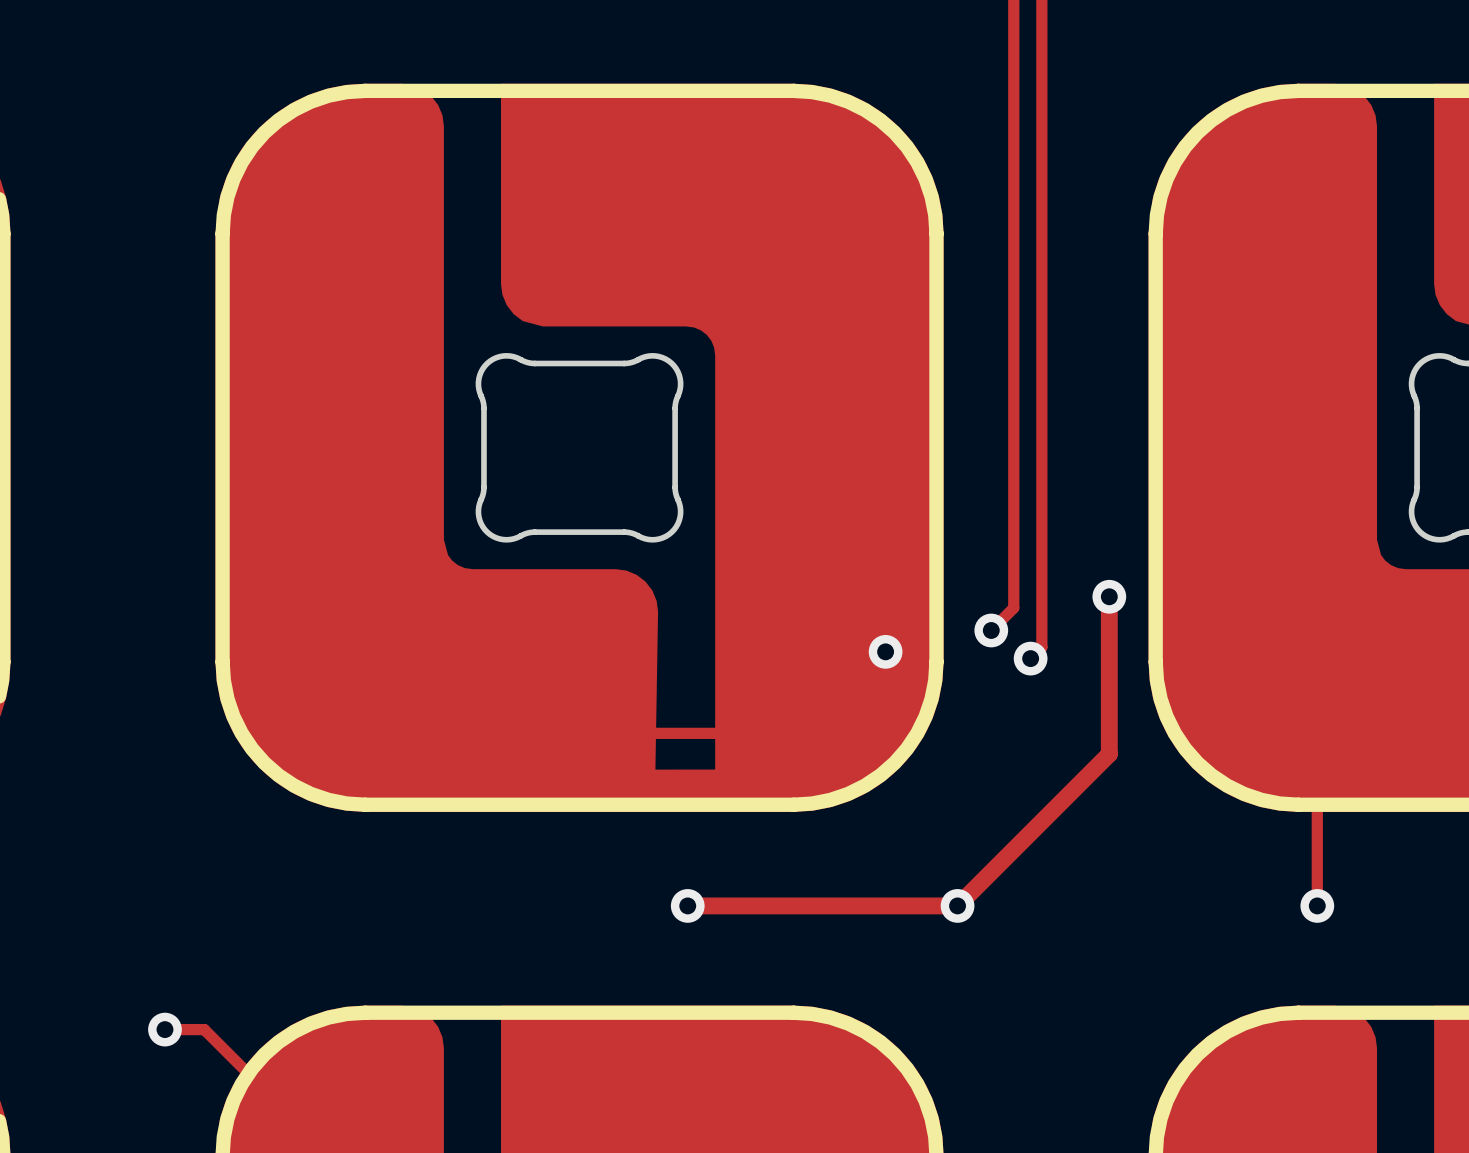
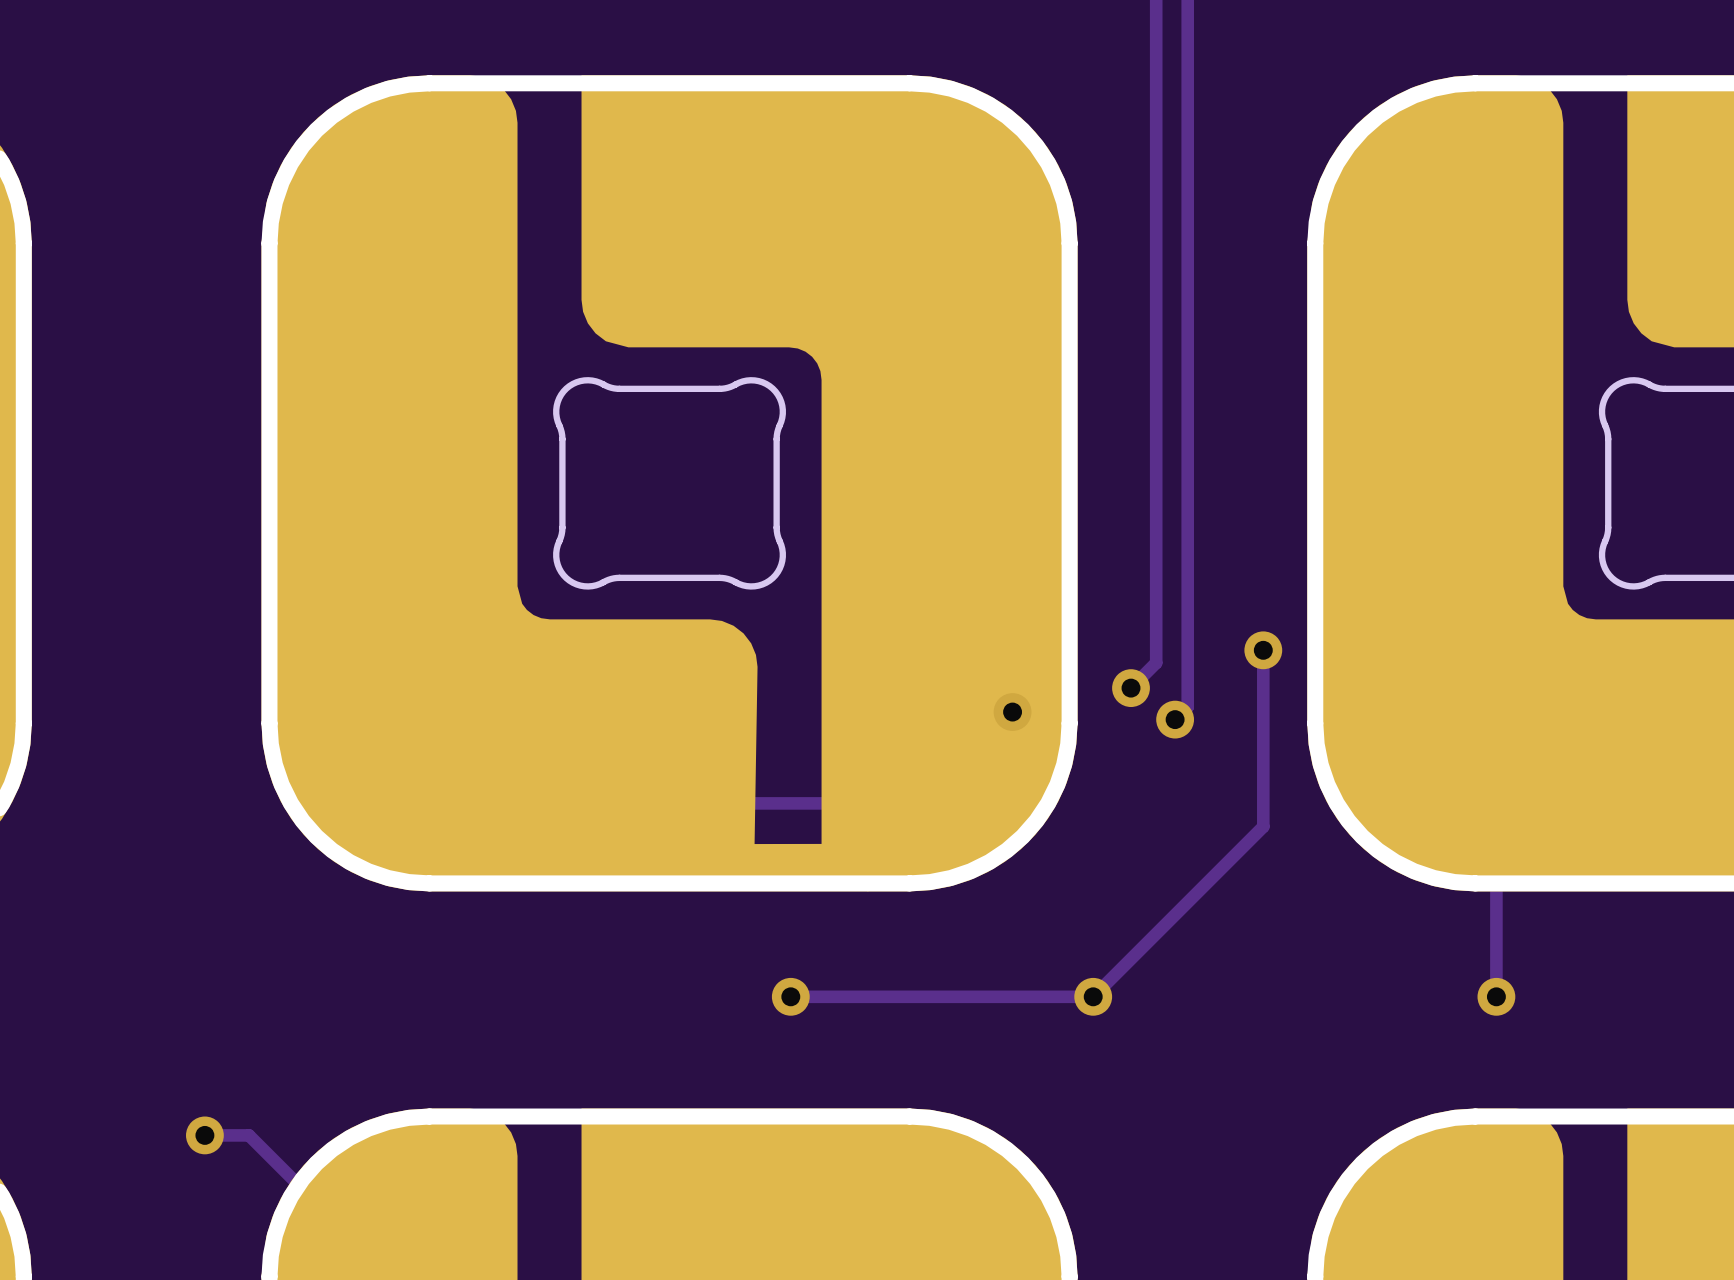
track width: thick (1109, 596) (1109, 754) (957, 905) (687, 905) -> thin (1263, 650) (1263, 826) (1093, 996) (790, 996)

